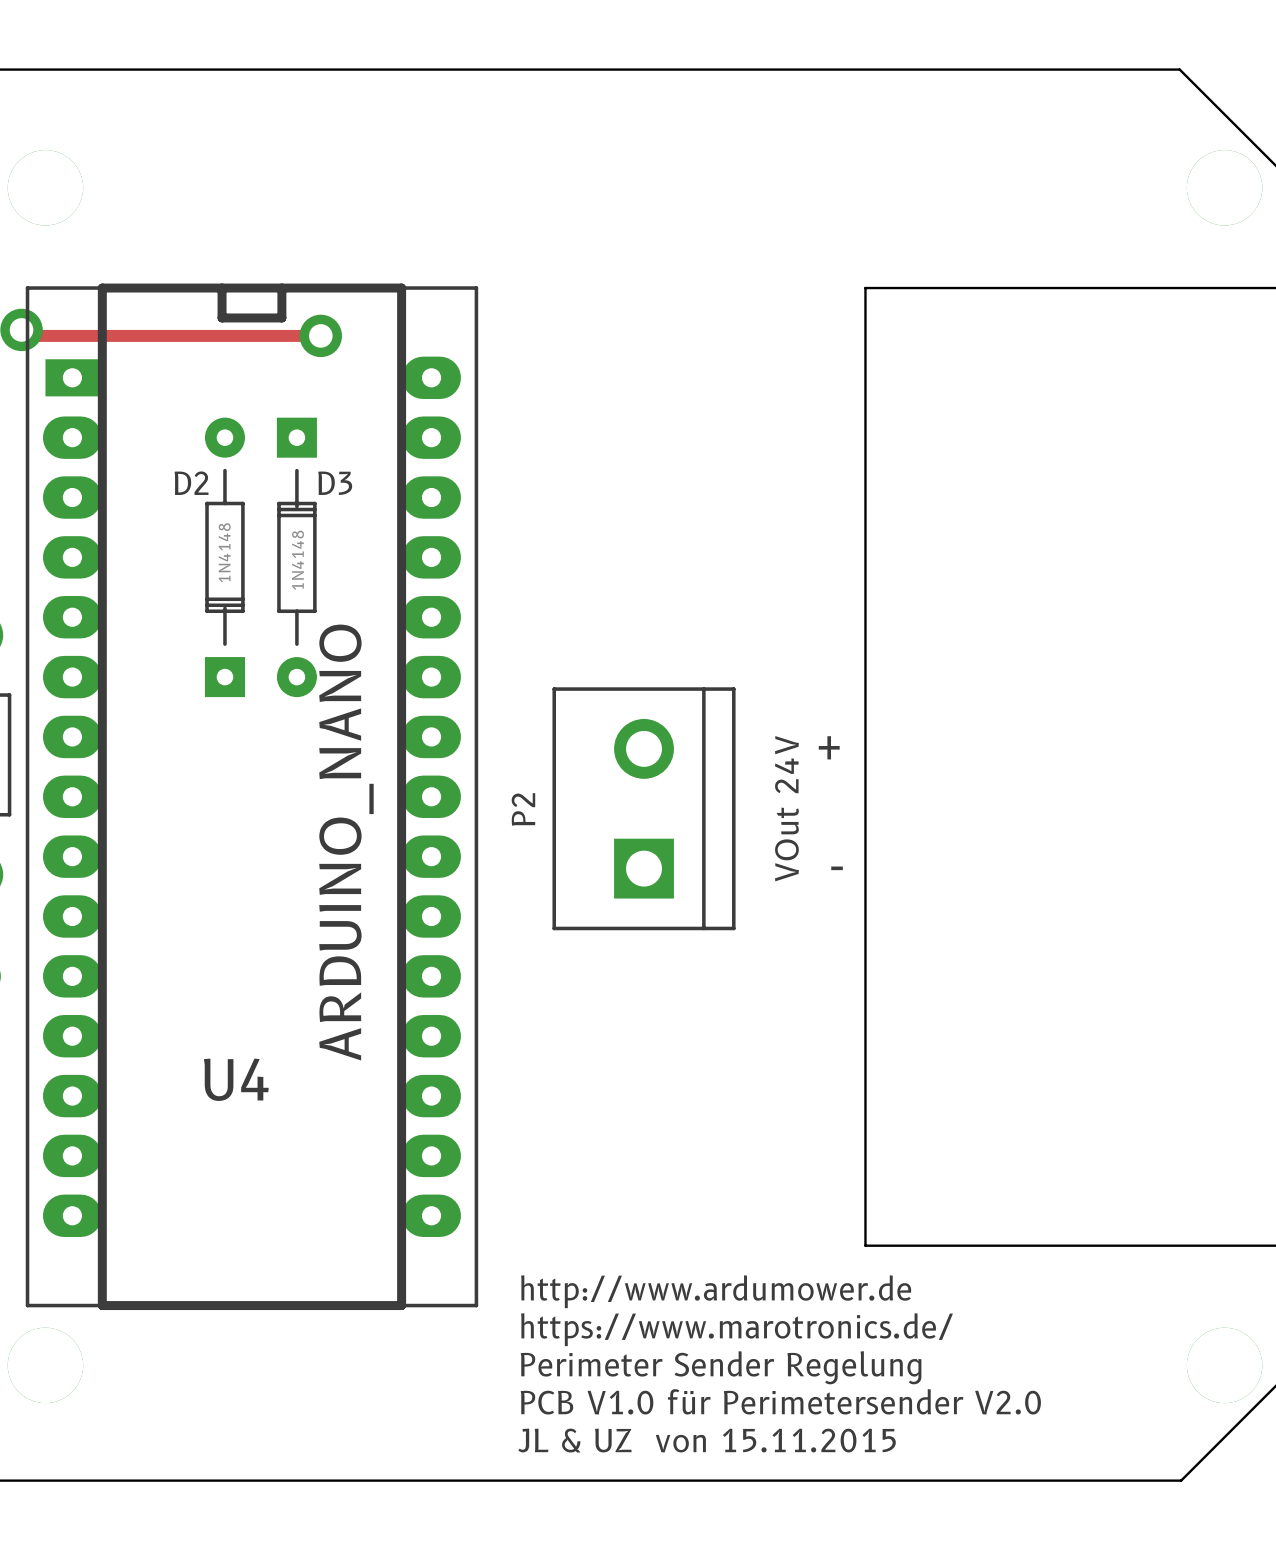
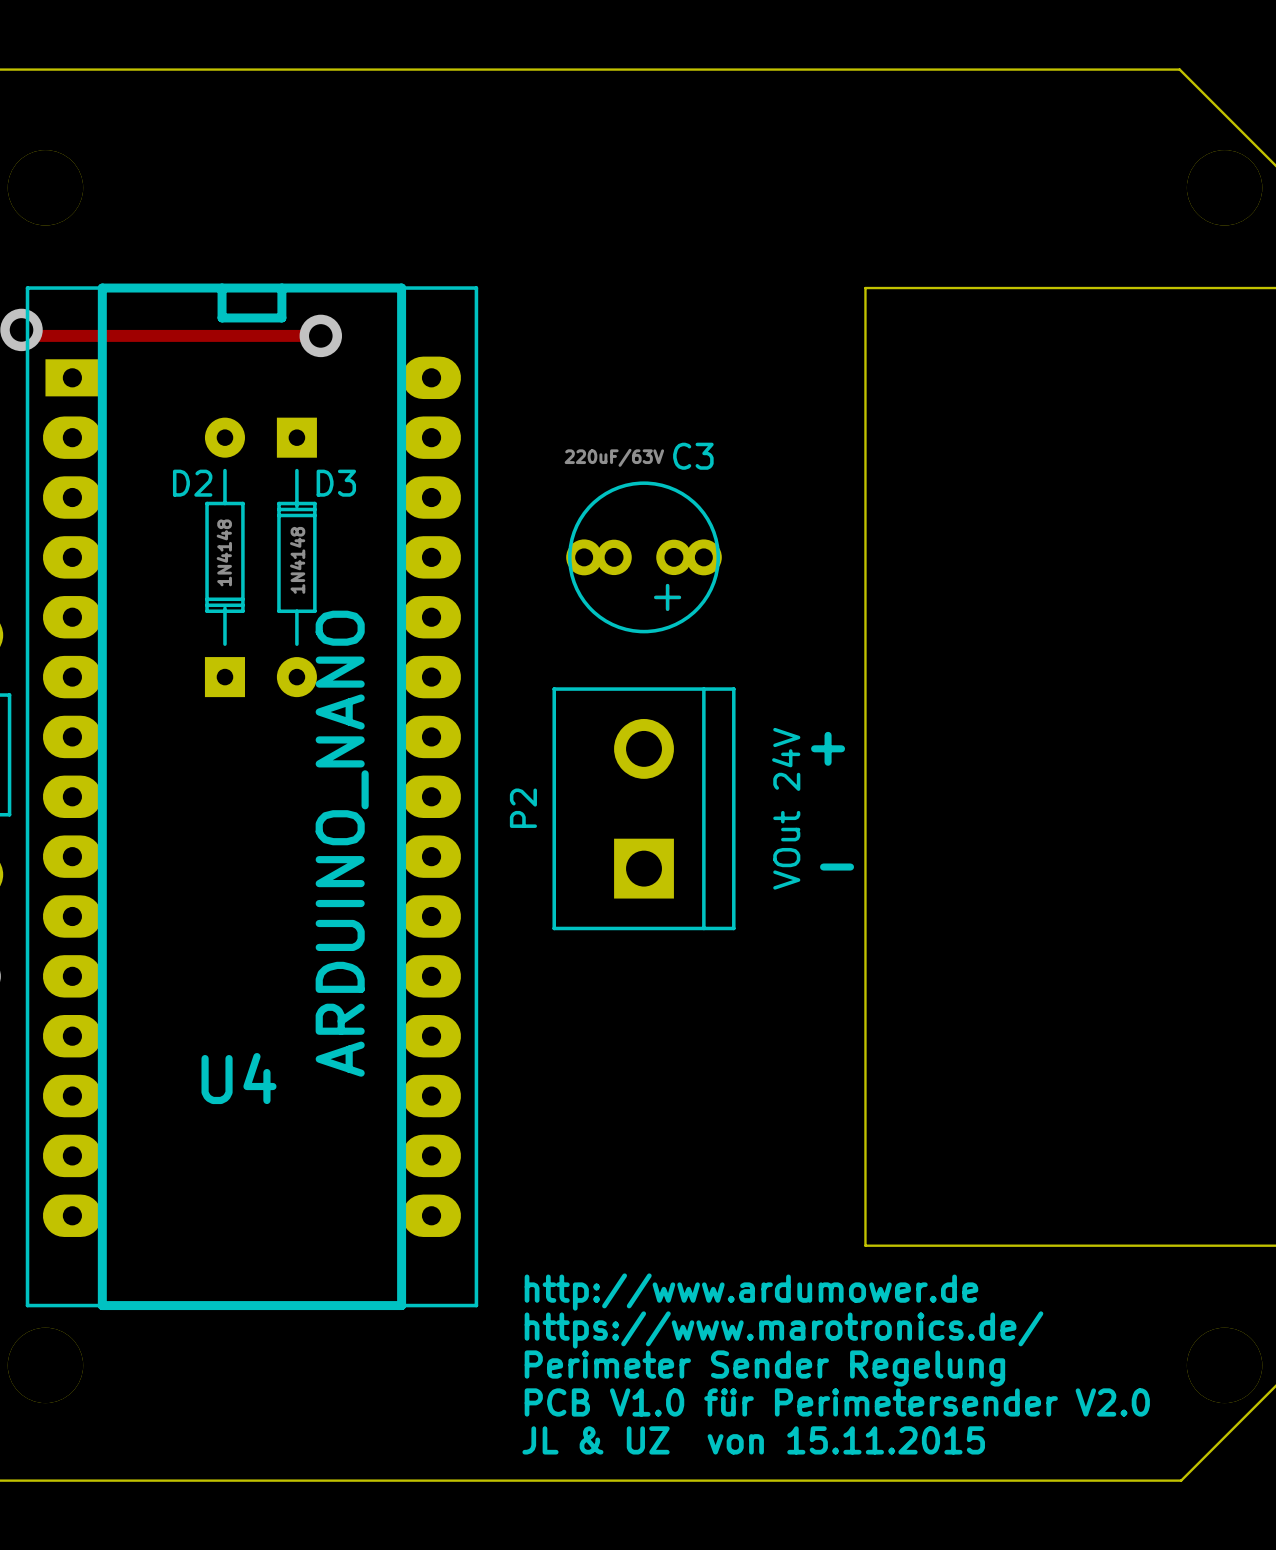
C3: none -> 220uF/63V (644, 557)

